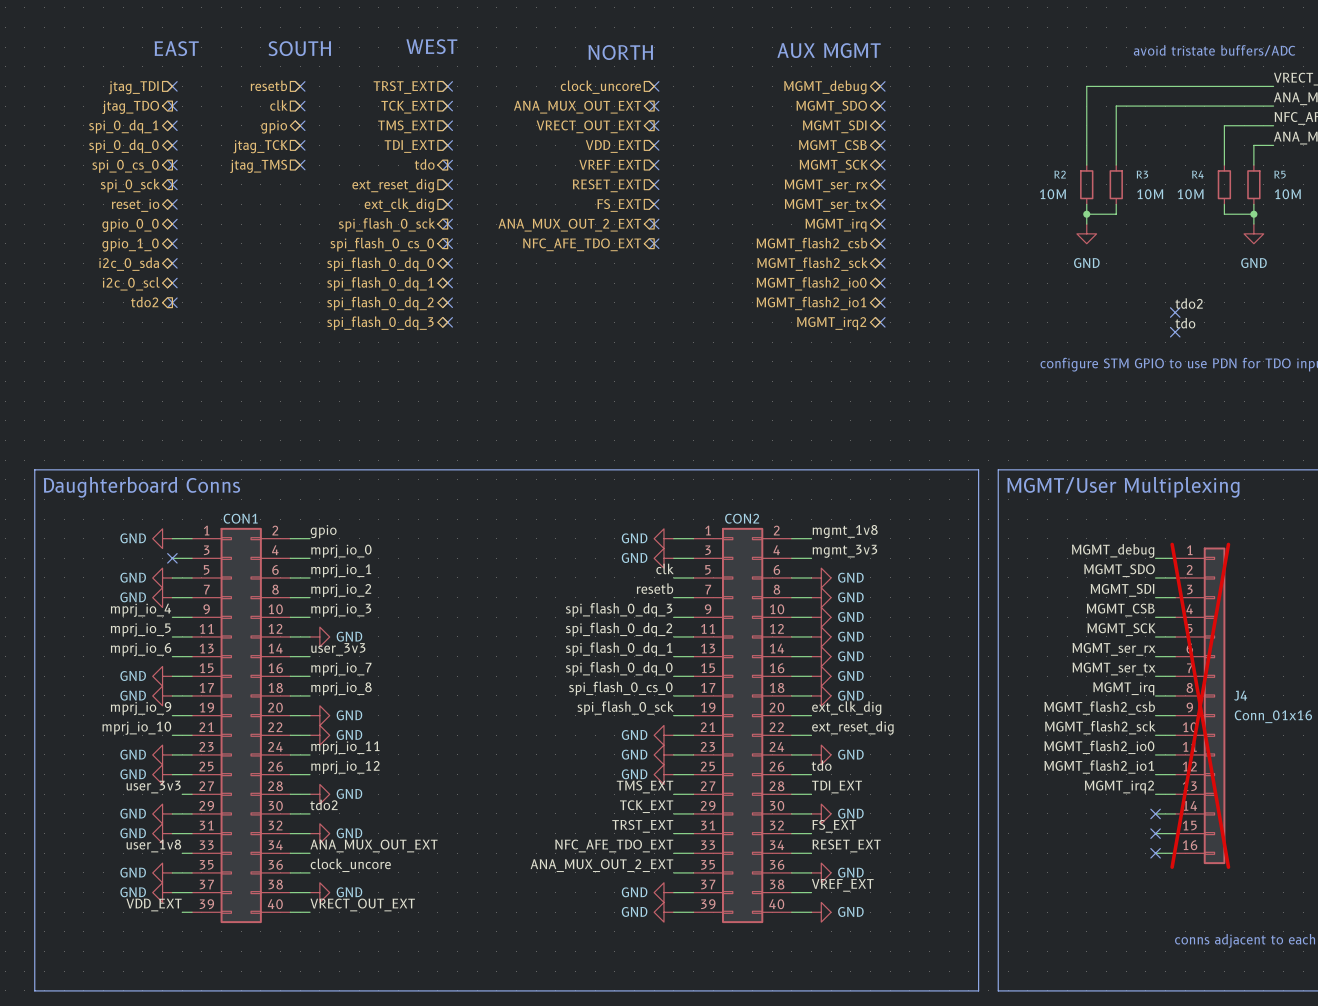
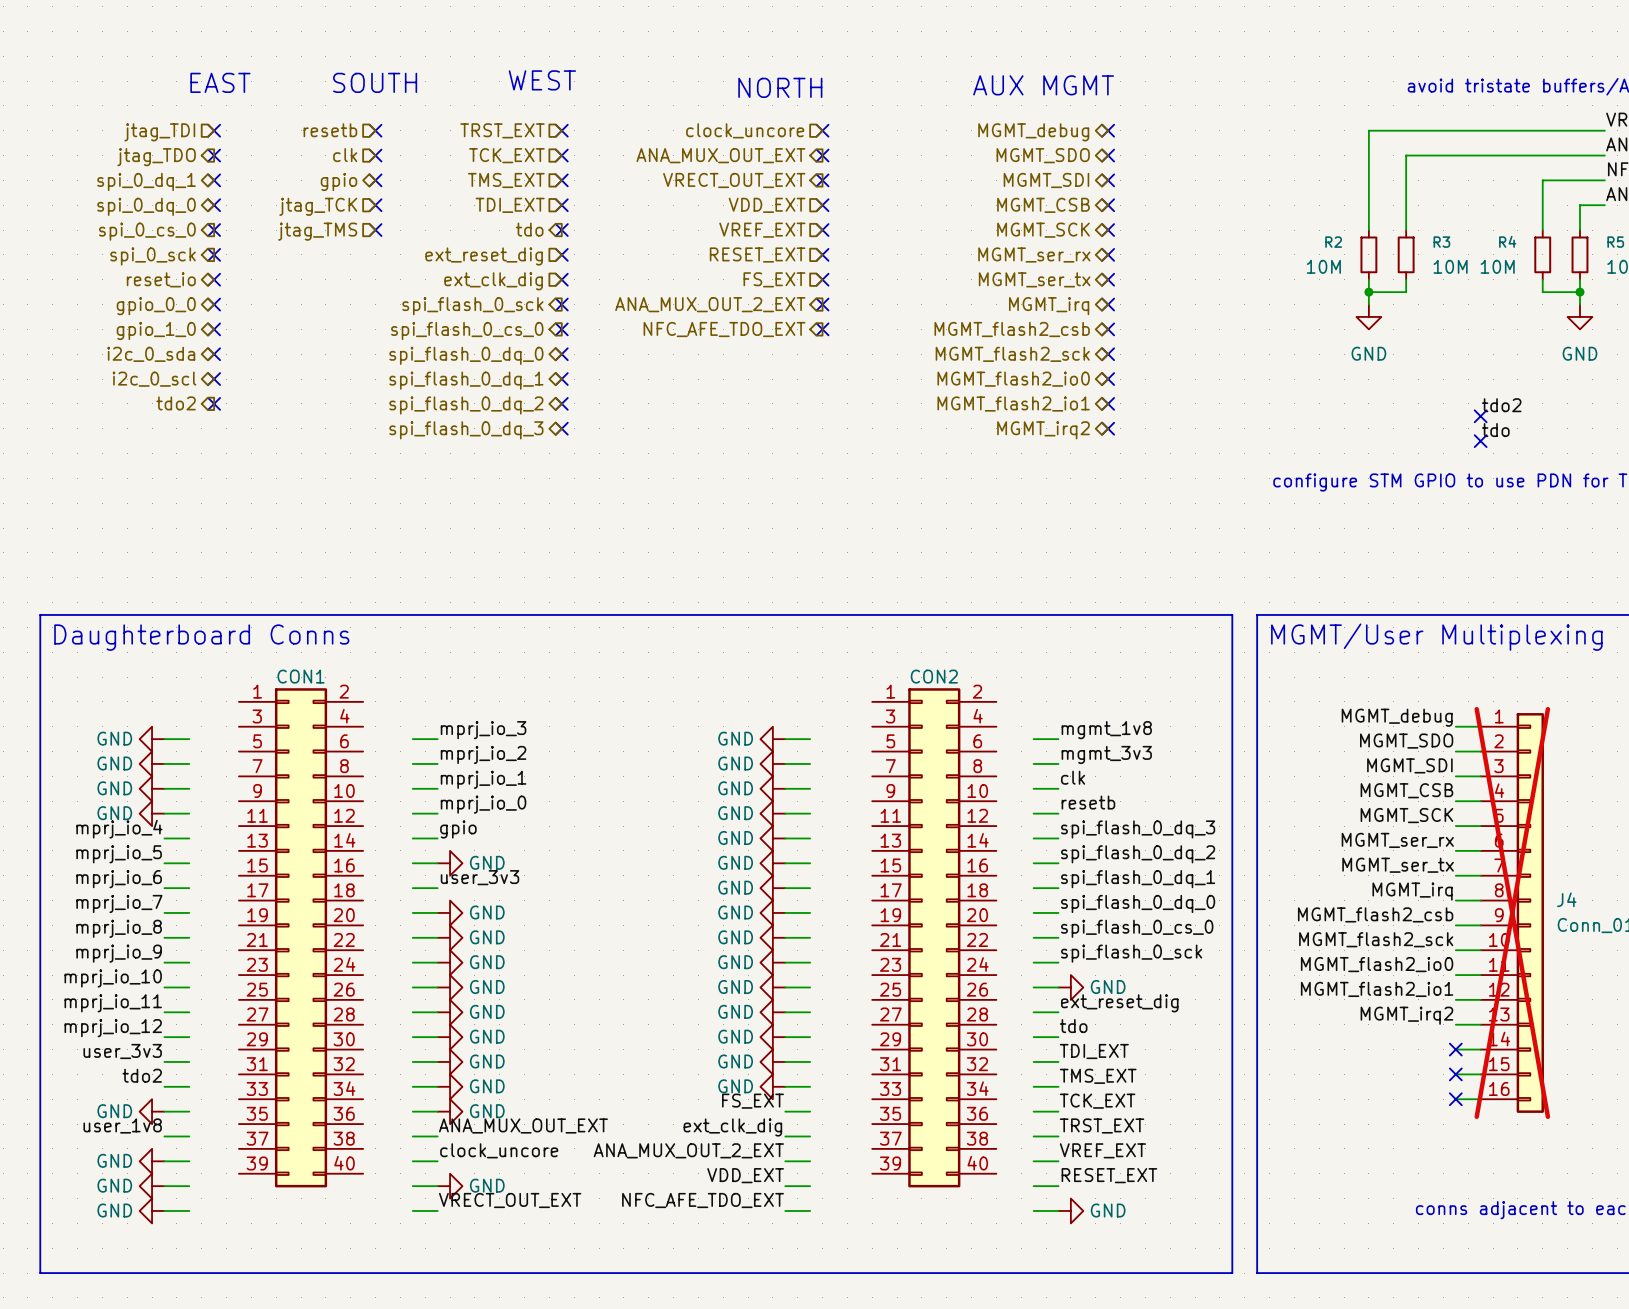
label position: gpio (323, 531) -> gpio (458, 829)
label position: mgmt_1v8 (845, 531) -> mgmt_1v8 (1106, 730)
power symbol: GND (162, 538) -> none
wire: (172, 538) (192, 538) -> (164, 739) (189, 739)
wire: (290, 538) (310, 538) -> (412, 739) (437, 739)
power symbol: GND (663, 538) -> none
wire: (673, 538) (693, 538) -> (785, 739) (810, 739)
wire: (791, 538) (811, 538) -> (1033, 739) (1058, 739)
label position: mprj_io_0 (341, 551) -> mprj_io_0 (483, 804)
label position: mgmt_3v3 (844, 551) -> mgmt_3v3 (1106, 754)
wire: (172, 558) (192, 558) -> (164, 763) (189, 763)
no-connect mark: (172, 558) -> none
wire: (290, 558) (310, 558) -> (412, 763) (437, 763)
power symbol: GND (663, 558) -> none
wire: (673, 558) (693, 558) -> (785, 763) (810, 763)
wire: (791, 558) (811, 558) -> (1033, 763) (1058, 763)
power symbol: none -> GND (152, 739)
power symbol: none -> GND (772, 739)
label position: clk (665, 568) -> clk (1073, 777)
label position: mprj_io_1 (341, 570) -> mprj_io_1 (483, 779)
power symbol: GND (162, 577) -> none
wire: (172, 577) (192, 577) -> (164, 788) (189, 788)
wire: (290, 577) (310, 577) -> (412, 788) (437, 788)
wire: (673, 577) (693, 577) -> (785, 788) (810, 788)
wire: (791, 577) (811, 577) -> (1033, 788) (1058, 788)
power symbol: GND (821, 577) -> none
power symbol: none -> GND (152, 763)
power symbol: none -> GND (772, 763)
label position: resetb (655, 588) -> resetb (1088, 802)
label position: mprj_io_2 (341, 590) -> mprj_io_2 (483, 754)
power symbol: GND (162, 597) -> none
wire: (172, 597) (192, 597) -> (164, 813) (189, 813)
wire: (290, 597) (310, 597) -> (412, 813) (437, 813)
wire: (673, 597) (693, 597) -> (785, 813) (810, 813)
wire: (791, 597) (811, 597) -> (1033, 813) (1058, 813)
power symbol: GND (821, 597) -> none
power symbol: none -> GND (152, 788)
power symbol: none -> GND (772, 788)
label position: spi_flash_0_dq_3 (619, 609) -> spi_flash_0_dq_3 (1138, 829)
label position: mprj_io_4 (141, 610) -> mprj_io_4 (119, 829)
label position: mprj_io_3 (341, 610) -> mprj_io_3 (483, 730)
wire: (172, 617) (192, 617) -> (164, 838) (189, 838)
wire: (290, 617) (310, 617) -> (412, 838) (437, 838)
wire: (673, 617) (693, 617) -> (785, 838) (810, 838)
wire: (791, 617) (811, 617) -> (1033, 838) (1058, 838)
power symbol: GND (821, 617) -> none
power symbol: none -> GND (152, 813)
power symbol: none -> GND (772, 813)
label position: mprj_io_5 (140, 629) -> mprj_io_5 (119, 854)
label position: spi_flash_0_dq_2 (619, 629) -> spi_flash_0_dq_2 (1138, 854)
wire: (172, 636) (192, 636) -> (164, 863) (189, 863)
wire: (290, 636) (310, 636) -> (412, 863) (437, 863)
power symbol: GND (319, 636) -> none
wire: (673, 636) (693, 636) -> (785, 863) (810, 863)
wire: (791, 636) (811, 636) -> (1033, 863) (1058, 863)
power symbol: GND (821, 636) -> none
power symbol: none -> GND (772, 838)
label position: mprj_io_6 (141, 649) -> mprj_io_6 (119, 879)
label position: user_3v3 (338, 649) -> user_3v3 (479, 877)
label position: spi_flash_0_dq_1 (619, 649) -> spi_flash_0_dq_1 (1138, 879)
wire: (172, 656) (192, 656) -> (164, 888) (189, 888)
wire: (290, 656) (310, 656) -> (412, 888) (437, 888)
wire: (673, 656) (693, 656) -> (785, 888) (810, 888)
wire: (791, 656) (811, 656) -> (1033, 888) (1058, 888)
power symbol: GND (821, 656) -> none
power symbol: none -> GND (450, 863)
power symbol: none -> GND (772, 863)
label position: spi_flash_0_dq_0 (619, 668) -> spi_flash_0_dq_0 (1138, 903)
label position: mprj_io_7 (341, 669) -> mprj_io_7 (119, 903)
power symbol: GND (162, 676) -> none
wire: (172, 676) (192, 676) -> (164, 912) (189, 912)
wire: (290, 676) (310, 676) -> (412, 912) (437, 912)
wire: (673, 676) (693, 676) -> (785, 912) (810, 912)
wire: (791, 676) (811, 676) -> (1033, 912) (1058, 912)
power symbol: GND (821, 676) -> none
power symbol: none -> GND (772, 888)
label position: mprj_io_8 (341, 688) -> mprj_io_8 (119, 928)
label position: spi_flash_0_cs_0 (620, 688) -> spi_flash_0_cs_0 (1137, 928)
power symbol: GND (162, 695) -> none
wire: (172, 695) (192, 695) -> (164, 937) (189, 937)
wire: (290, 695) (310, 695) -> (412, 937) (437, 937)
wire: (673, 695) (693, 695) -> (785, 937) (810, 937)
wire: (791, 695) (811, 695) -> (1033, 937) (1058, 937)
power symbol: GND (821, 695) -> none
power symbol: none -> GND (450, 912)
power symbol: none -> GND (772, 912)
label position: mprj_io_9 (141, 708) -> mprj_io_9 (119, 953)
label position: spi_flash_0_sck (625, 708) -> spi_flash_0_sck (1131, 953)
label: ext_clk_dig (846, 708) -> none
wire: (172, 715) (192, 715) -> (164, 962) (189, 962)
wire: (290, 715) (310, 715) -> (412, 962) (437, 962)
power symbol: GND (319, 715) -> none
wire: (673, 715) (693, 715) -> (785, 962) (810, 962)
wire: (791, 715) (811, 715) -> (1033, 962) (1058, 962)
power symbol: none -> GND (450, 937)
power symbol: none -> GND (772, 937)
label position: ext_reset_dig (852, 727) -> ext_reset_dig (1119, 1003)
label position: mprj_io_10 (136, 728) -> mprj_io_10 (113, 978)
wire: (172, 735) (192, 735) -> (164, 987) (189, 987)
wire: (290, 735) (310, 735) -> (412, 987) (437, 987)
power symbol: GND (319, 735) -> none
power symbol: GND (663, 735) -> none
wire: (673, 735) (693, 735) -> (785, 987) (810, 987)
wire: (791, 735) (811, 735) -> (1033, 987) (1058, 987)
power symbol: none -> GND (450, 962)
power symbol: none -> GND (772, 962)
label position: mprj_io_11 (345, 747) -> mprj_io_11 (113, 1003)
power symbol: GND (162, 754) -> none
wire: (172, 754) (192, 754) -> (164, 1012) (189, 1012)
wire: (290, 754) (310, 754) -> (412, 1012) (437, 1012)
power symbol: GND (663, 754) -> none
wire: (673, 754) (693, 754) -> (785, 1012) (810, 1012)
wire: (791, 754) (811, 754) -> (1033, 1012) (1058, 1012)
power symbol: GND (821, 754) -> none
power symbol: none -> GND (450, 987)
power symbol: none -> GND (772, 987)
power symbol: none -> GND (1070, 987)
label position: tdo (821, 765) -> tdo (1073, 1026)
label position: mprj_io_12 (345, 767) -> mprj_io_12 (113, 1028)
power symbol: GND (162, 774) -> none
wire: (172, 774) (192, 774) -> (164, 1037) (189, 1037)
wire: (290, 774) (310, 774) -> (412, 1037) (437, 1037)
power symbol: GND (663, 774) -> none
wire: (673, 774) (693, 774) -> (785, 1037) (810, 1037)
wire: (791, 774) (811, 774) -> (1033, 1037) (1058, 1037)
power symbol: none -> GND (450, 1012)
power symbol: none -> GND (772, 1012)
label position: TMS_EXT (645, 786) -> TMS_EXT (1098, 1076)
label position: TDI_EXT (836, 786) -> TDI_EXT (1094, 1051)
label position: user_3v3 (153, 787) -> user_3v3 (122, 1051)
wire: (182, 794) (192, 794) -> none
wire: (290, 794) (310, 794) -> (412, 1061) (437, 1061)
power symbol: GND (319, 794) -> none
wire: (673, 794) (693, 794) -> (785, 1061) (810, 1061)
wire: (791, 794) (811, 794) -> (1033, 1061) (1058, 1061)
label position: tdo2 (323, 804) -> tdo2 (142, 1075)
power symbol: none -> GND (450, 1037)
power symbol: none -> GND (772, 1037)
label position: TCK_EXT (646, 806) -> TCK_EXT (1097, 1101)
power symbol: GND (162, 813) -> none
wire: (172, 813) (192, 813) -> (164, 1086) (189, 1086)
wire: (290, 813) (310, 813) -> (412, 1086) (437, 1086)
wire: (673, 813) (693, 813) -> (785, 1086) (810, 1086)
wire: (791, 813) (811, 813) -> (1033, 1086) (1058, 1086)
power symbol: GND (821, 813) -> none
wire: none -> (164, 1061) (189, 1061)
power symbol: none -> GND (450, 1061)
power symbol: none -> GND (772, 1061)
label position: TRST_EXT (642, 826) -> TRST_EXT (1102, 1125)
label position: FS_EXT (834, 826) -> FS_EXT (752, 1101)
power symbol: GND (162, 833) -> none
wire: (172, 833) (192, 833) -> (164, 1111) (189, 1111)
wire: (290, 833) (310, 833) -> (412, 1111) (437, 1111)
power symbol: GND (319, 833) -> none
wire: (673, 833) (693, 833) -> (785, 1111) (810, 1111)
wire: (791, 833) (811, 833) -> (1033, 1111) (1058, 1111)
power symbol: none -> GND (450, 1086)
power symbol: none -> GND (772, 1086)
label position: user_1v8 (153, 845) -> user_1v8 (122, 1125)
label position: ANA_MUX_OUT_EXT (374, 845) -> ANA_MUX_OUT_EXT (523, 1125)
label position: NFC_AFE_TDO_EXT (614, 845) -> NFC_AFE_TDO_EXT (703, 1200)
label position: RESET_EXT (846, 845) -> RESET_EXT (1109, 1175)
wire: (182, 853) (192, 853) -> none
wire: (290, 853) (310, 853) -> (412, 1136) (437, 1136)
wire: (673, 853) (693, 853) -> (785, 1136) (810, 1136)
wire: (791, 853) (811, 853) -> (1033, 1136) (1058, 1136)
power symbol: none -> GND (152, 1111)
power symbol: none -> GND (450, 1111)
label position: clock_uncore (350, 865) -> clock_uncore (499, 1150)
label position: ANA_MUX_OUT_2_EXT (601, 865) -> ANA_MUX_OUT_2_EXT (688, 1150)
power symbol: GND (162, 872) -> none
wire: (172, 872) (192, 872) -> (164, 1161) (189, 1161)
wire: (290, 872) (310, 872) -> (412, 1161) (437, 1161)
wire: (673, 872) (693, 872) -> (785, 1161) (810, 1161)
wire: (791, 872) (811, 872) -> (1033, 1161) (1058, 1161)
power symbol: GND (821, 872) -> none
label: none -> ext_clk_dig (732, 1127)
wire: none -> (164, 1136) (189, 1136)
label position: VREF_EXT (842, 885) -> VREF_EXT (1102, 1150)
power symbol: GND (162, 892) -> none
wire: (172, 892) (192, 892) -> (164, 1186) (189, 1186)
wire: (290, 892) (310, 892) -> (412, 1186) (437, 1186)
power symbol: GND (319, 892) -> none
power symbol: GND (663, 892) -> none
wire: (673, 892) (693, 892) -> (785, 1186) (810, 1186)
wire: (791, 892) (811, 892) -> (1033, 1186) (1058, 1186)
power symbol: none -> GND (152, 1161)
label: VDD_EXT (154, 904) -> none
label position: VRECT_OUT_EXT (362, 904) -> VRECT_OUT_EXT (510, 1200)
wire: (182, 912) (192, 912) -> none
wire: (290, 912) (310, 912) -> (412, 1210) (437, 1210)
power symbol: GND (663, 912) -> none
wire: (673, 912) (693, 912) -> (785, 1210) (810, 1210)
wire: (791, 912) (811, 912) -> (1033, 1210) (1058, 1210)
power symbol: GND (821, 912) -> none
label: none -> VDD_EXT (745, 1175)
power symbol: none -> GND (152, 1186)
power symbol: none -> GND (450, 1186)
power symbol: none -> GND (152, 1210)
wire: none -> (164, 1210) (189, 1210)
power symbol: none -> GND (1070, 1210)

